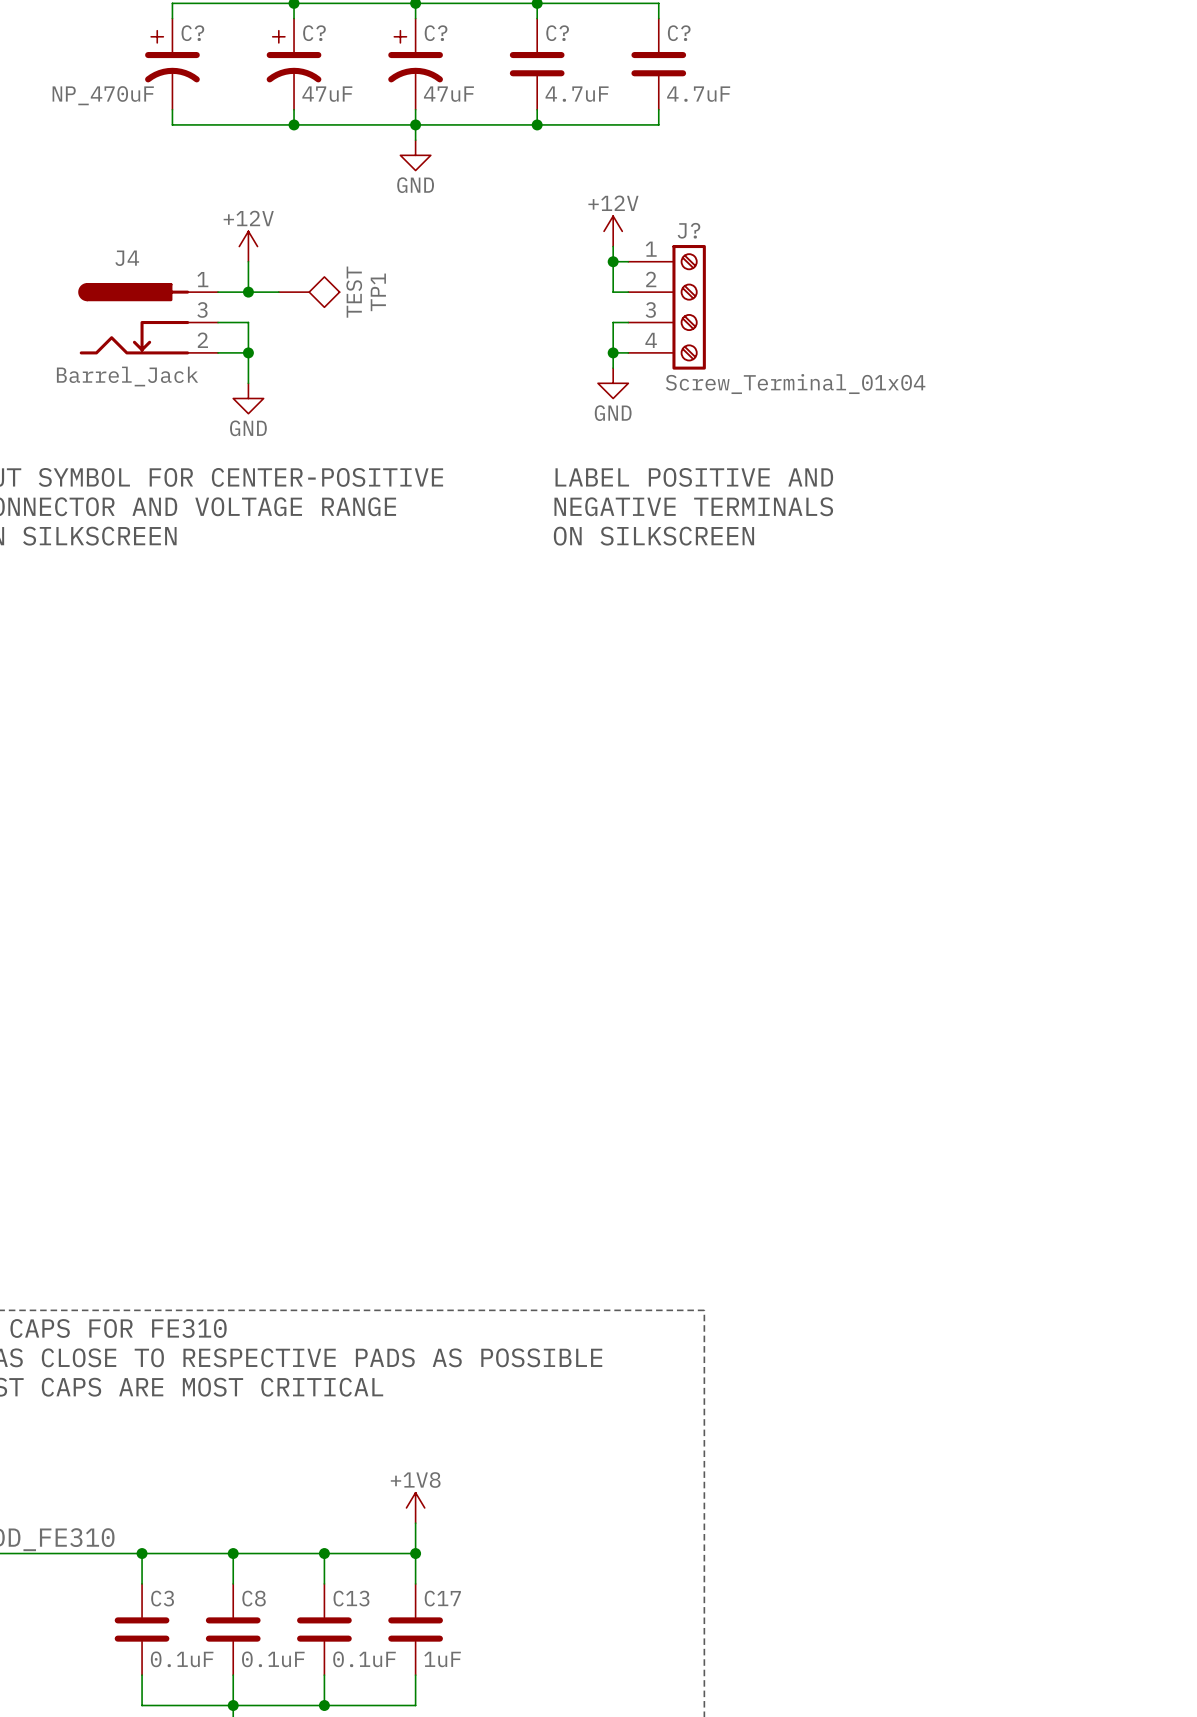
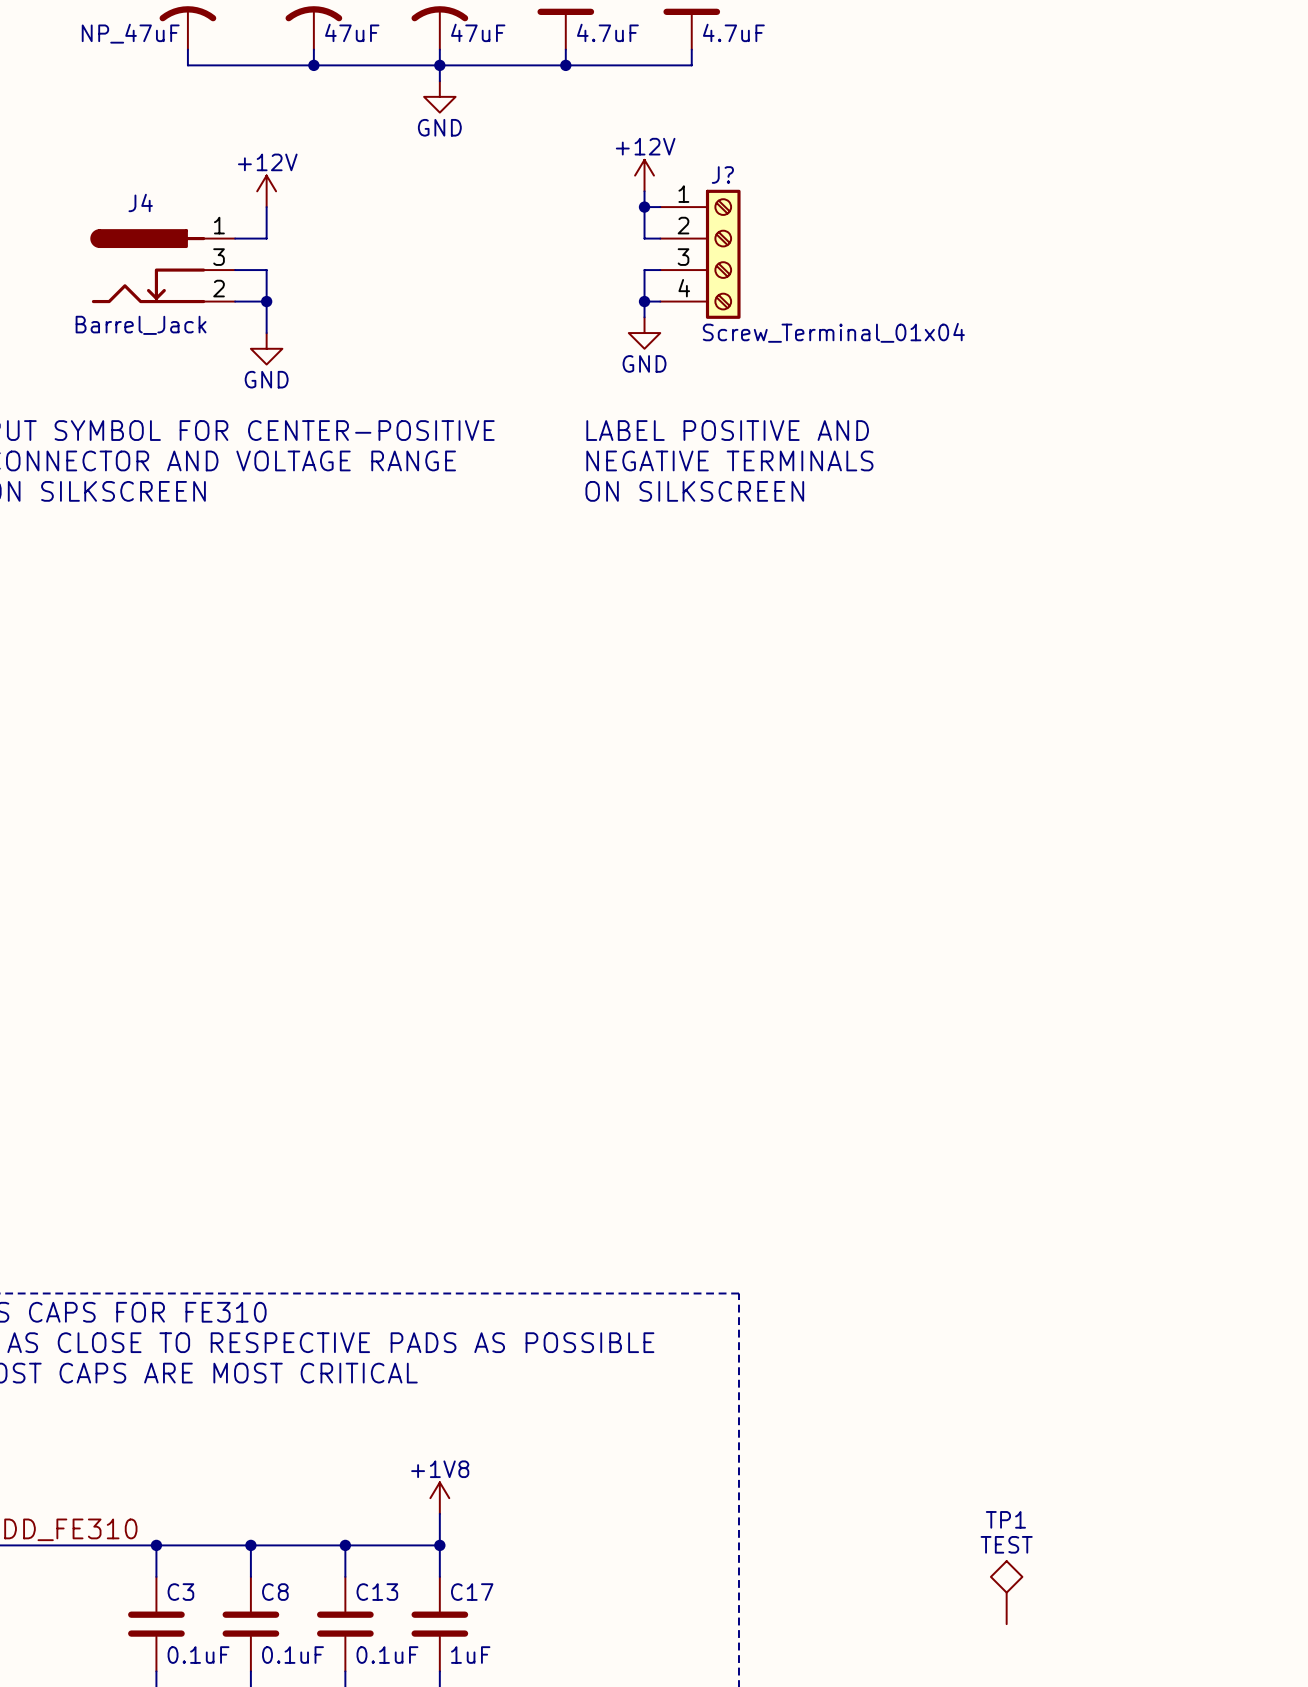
C? value: NP_470uF (103, 95) -> NP_47uF (130, 33)
wire: (248, 292) (278, 292) -> none
junction: (248, 292) -> none
TP1 position: (309, 292) -> (1006, 1592)
TP1 rotation: 0° (324, 292) -> 90° counterclockwise (1006, 1576)

